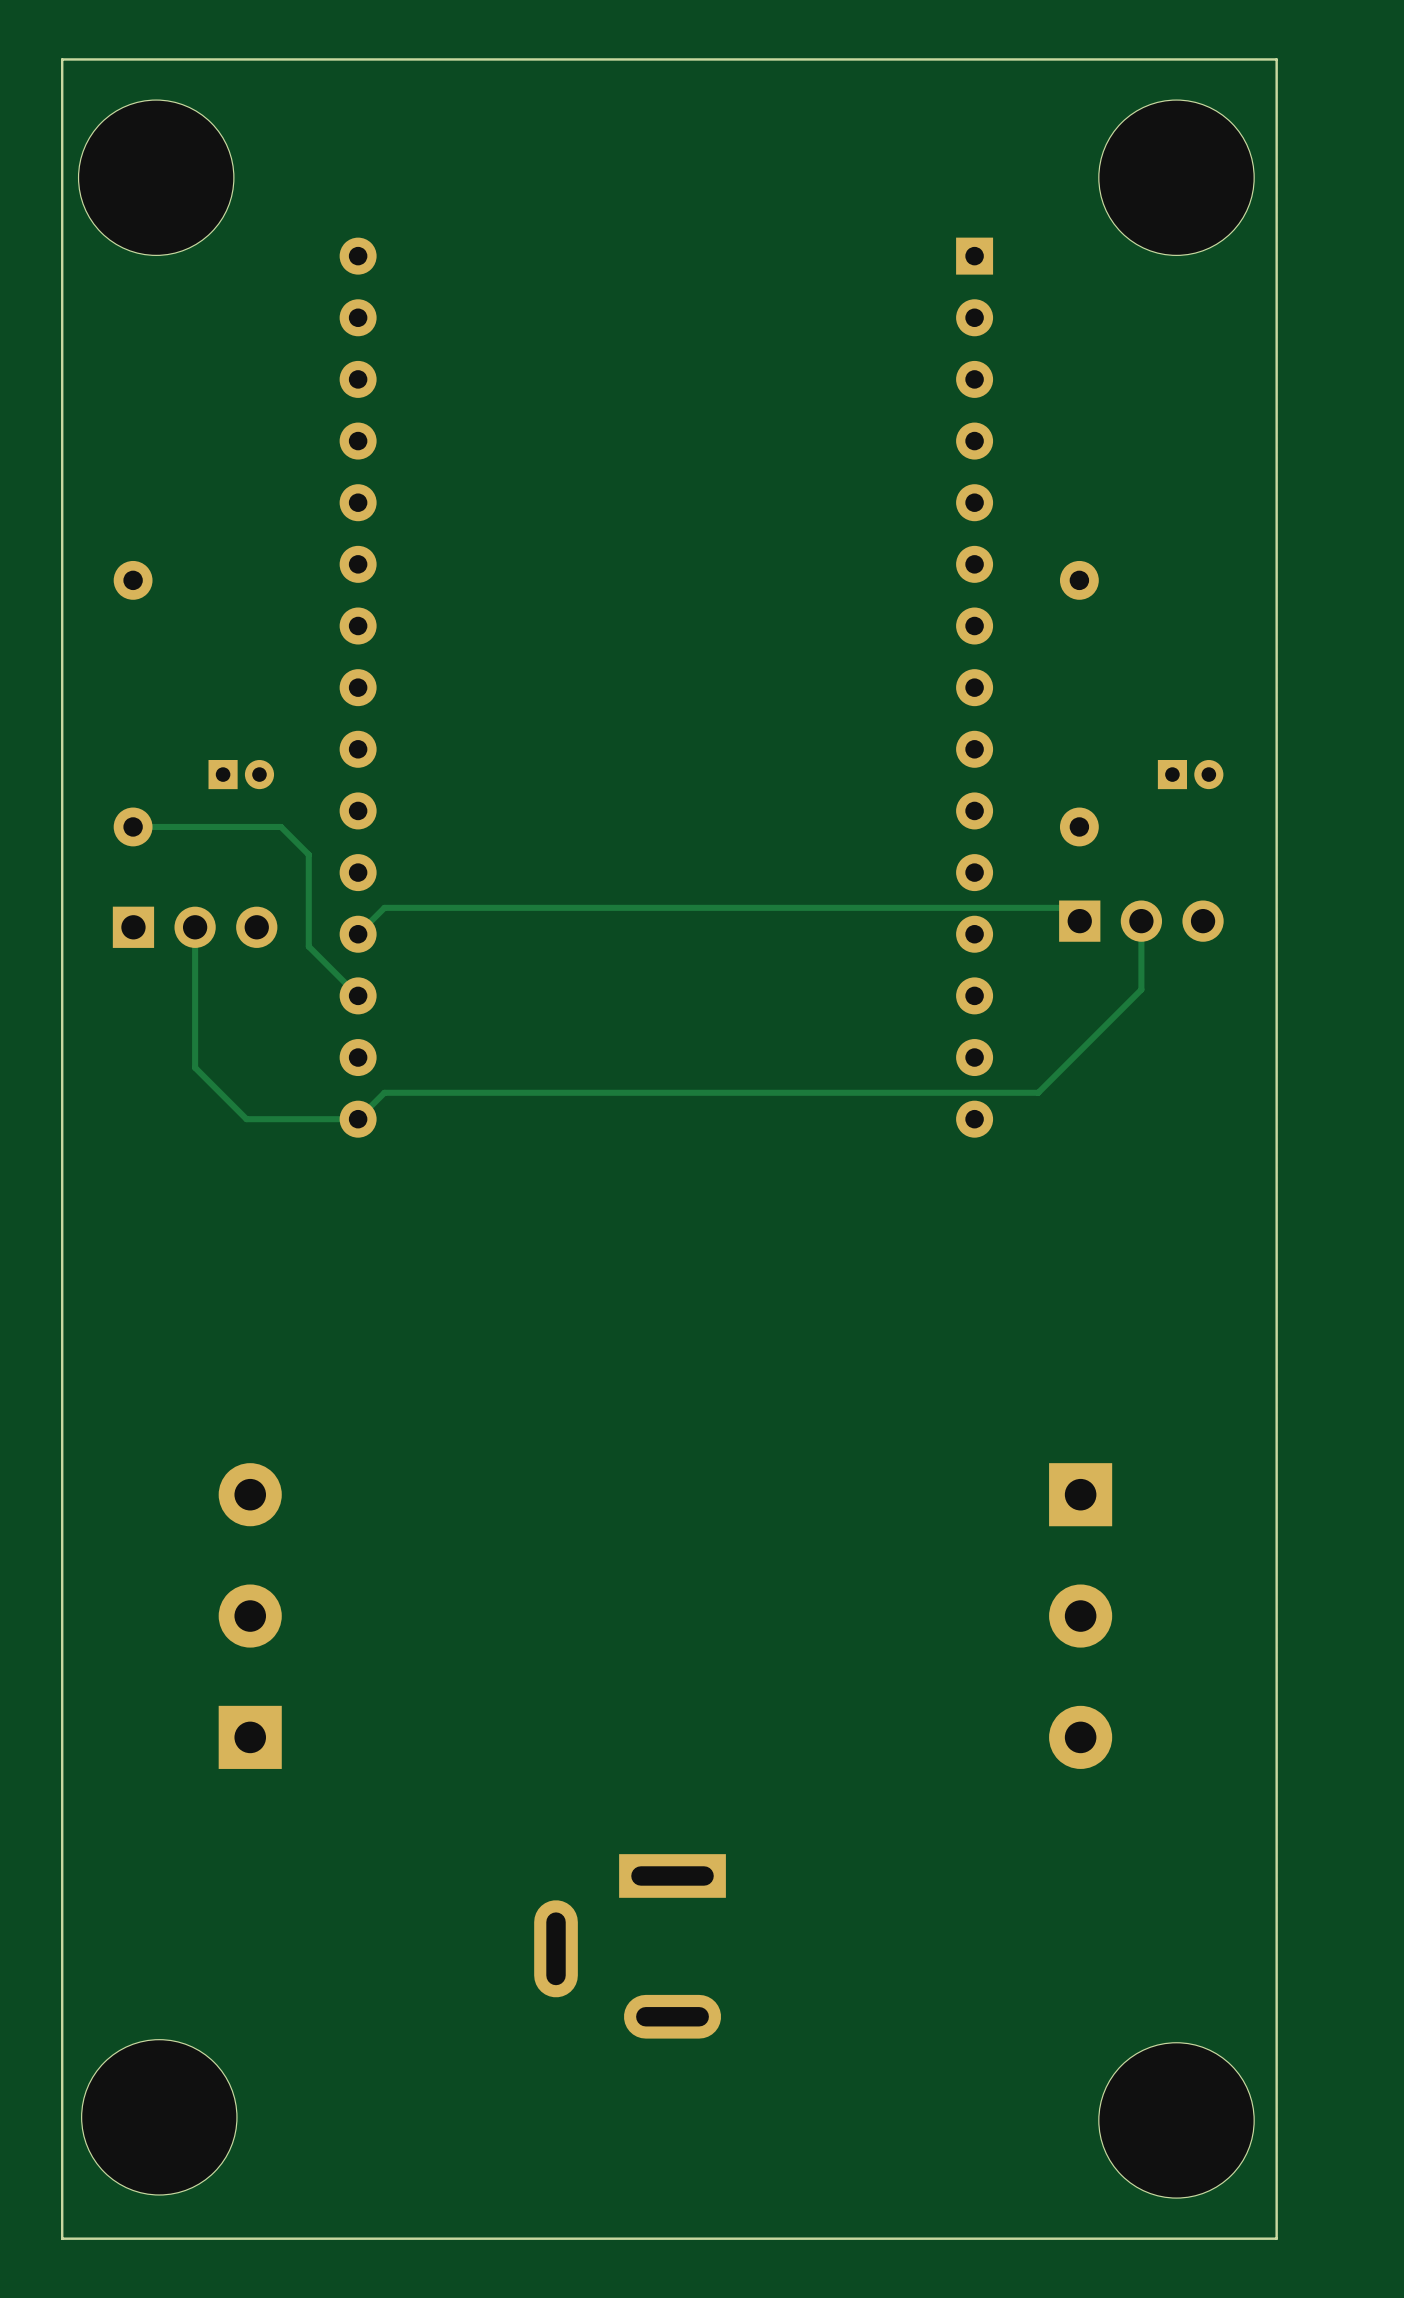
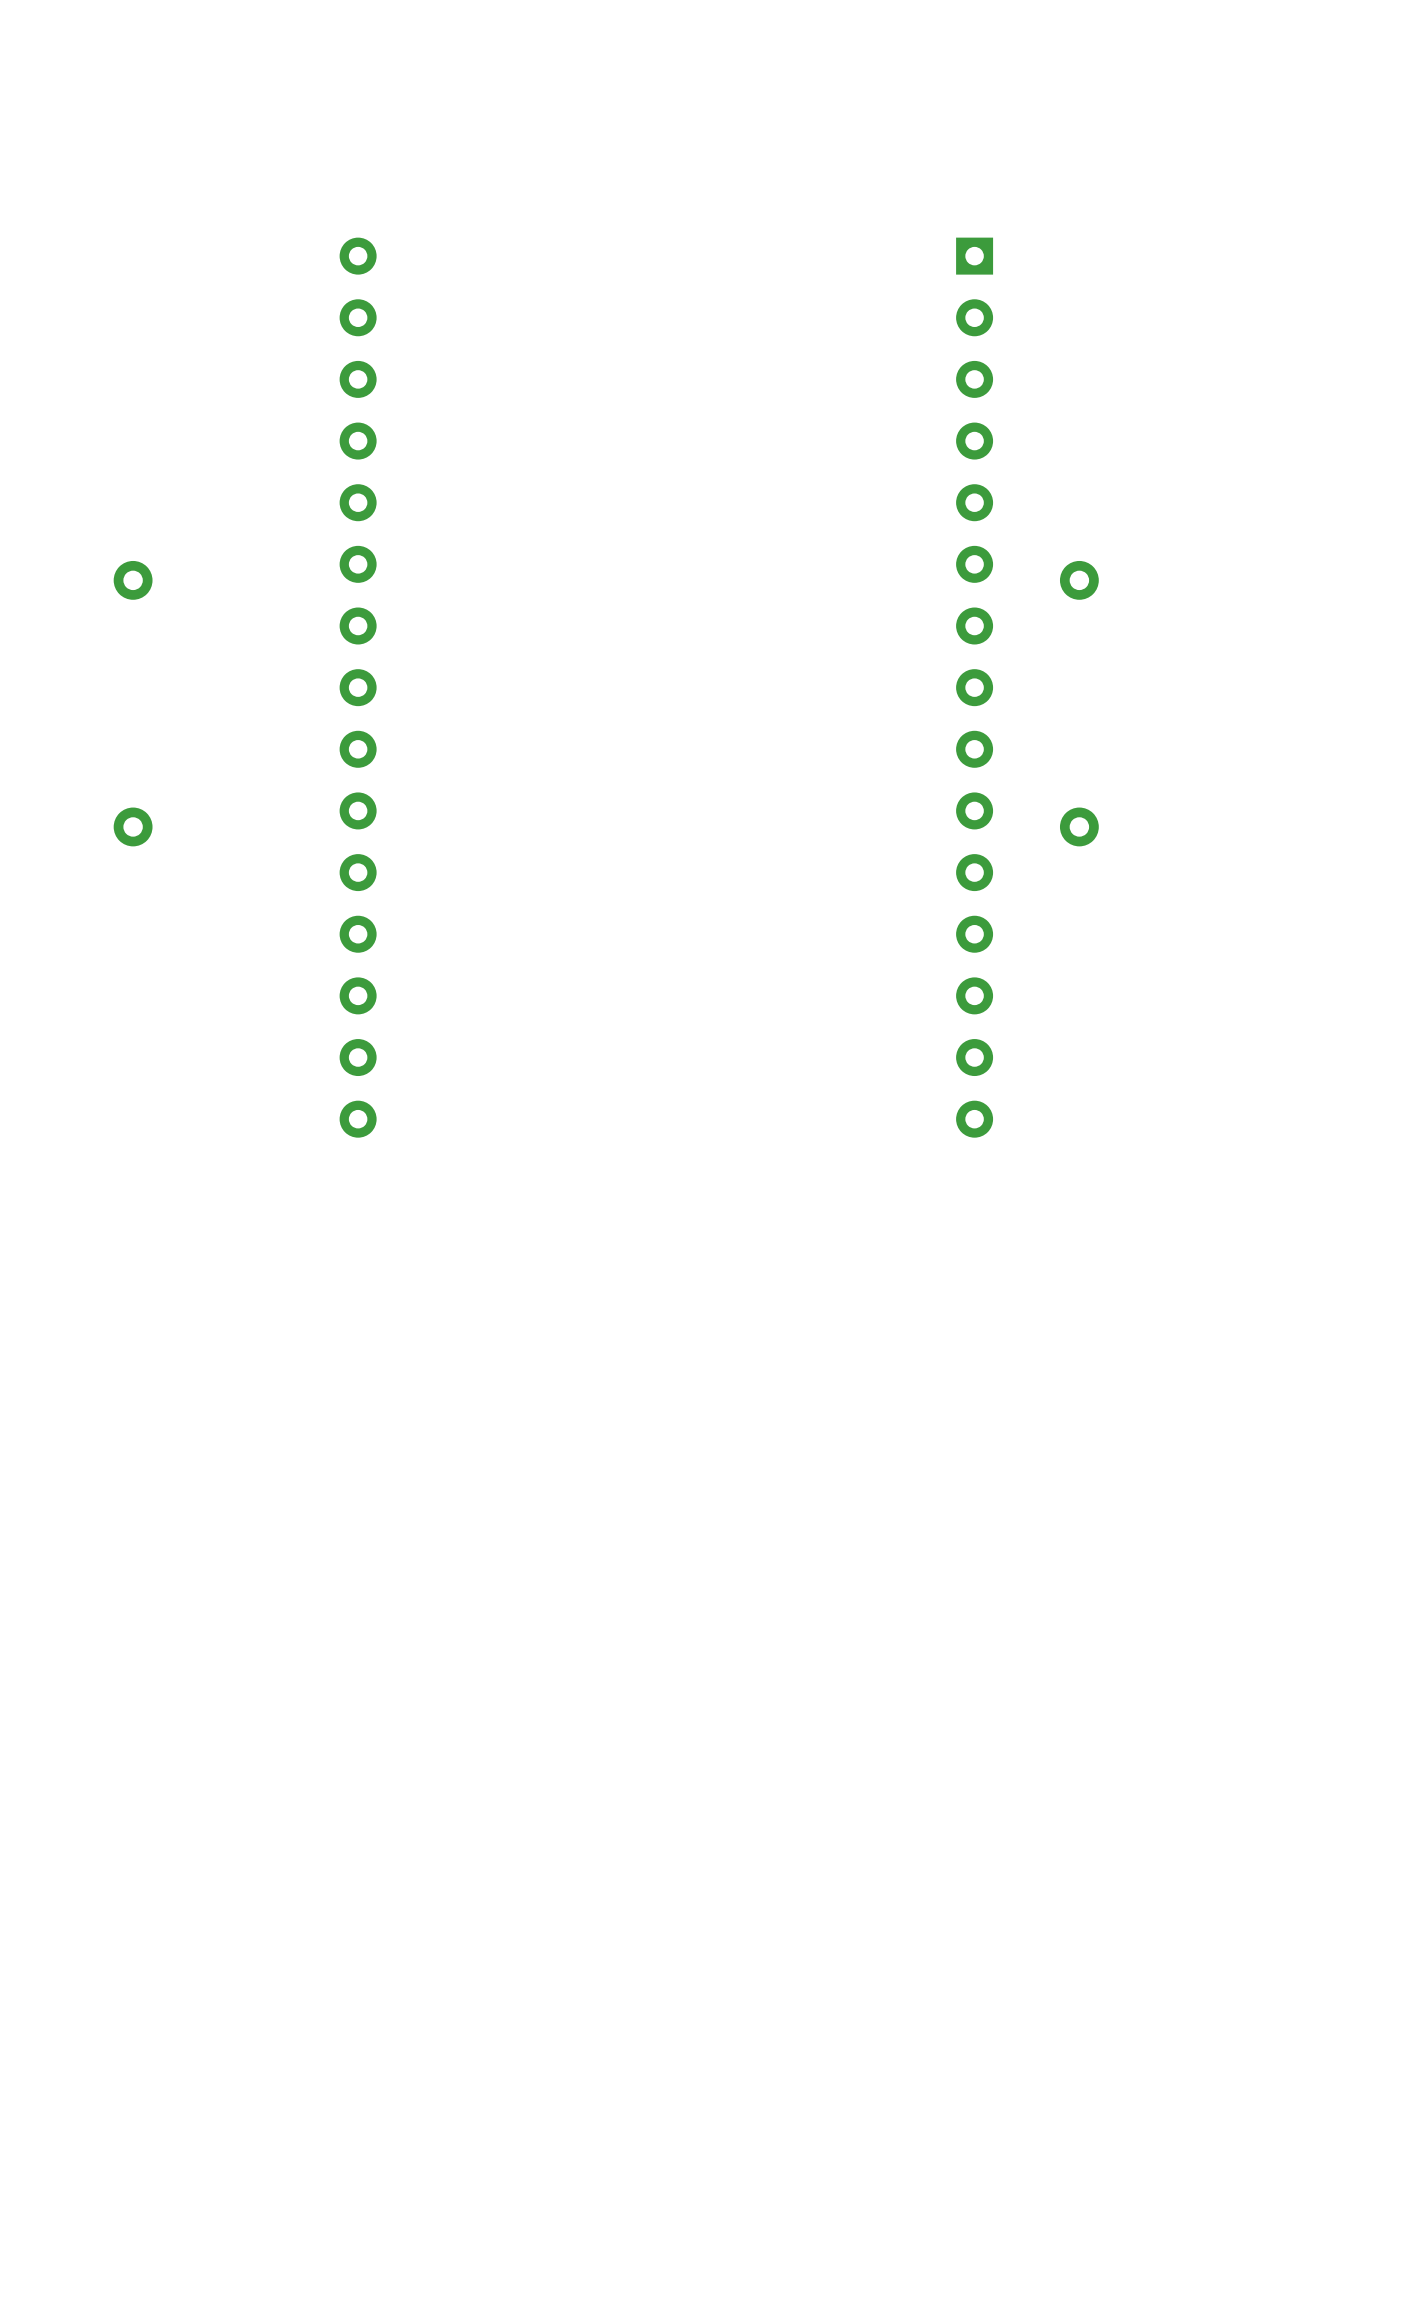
board edge: (1276, 59) (62, 59) (62, 2238) (1276, 2238) (1276, 59) -> none
part: (156, 177) -> none
part: (1176, 177) -> none
part: (241, 774) -> none
part: (1190, 774) -> none
track: (133, 826) (281, 826) (308, 854) (308, 946) (358, 995) (358, 987) -> none
track: (1079, 921) (1066, 907) (384, 907) (358, 934) -> none
track: (1141, 921) (1141, 989) (1038, 1092) (384, 1092) (358, 1119) (246, 1119) (195, 1067) (195, 927) -> none
part: (1141, 921) -> none
part: (195, 927) -> none
part: (250, 1616) -> none
part: (1080, 1616) -> none
part: (630, 1946) -> none
part: (159, 2117) -> none
part: (1176, 2120) -> none

